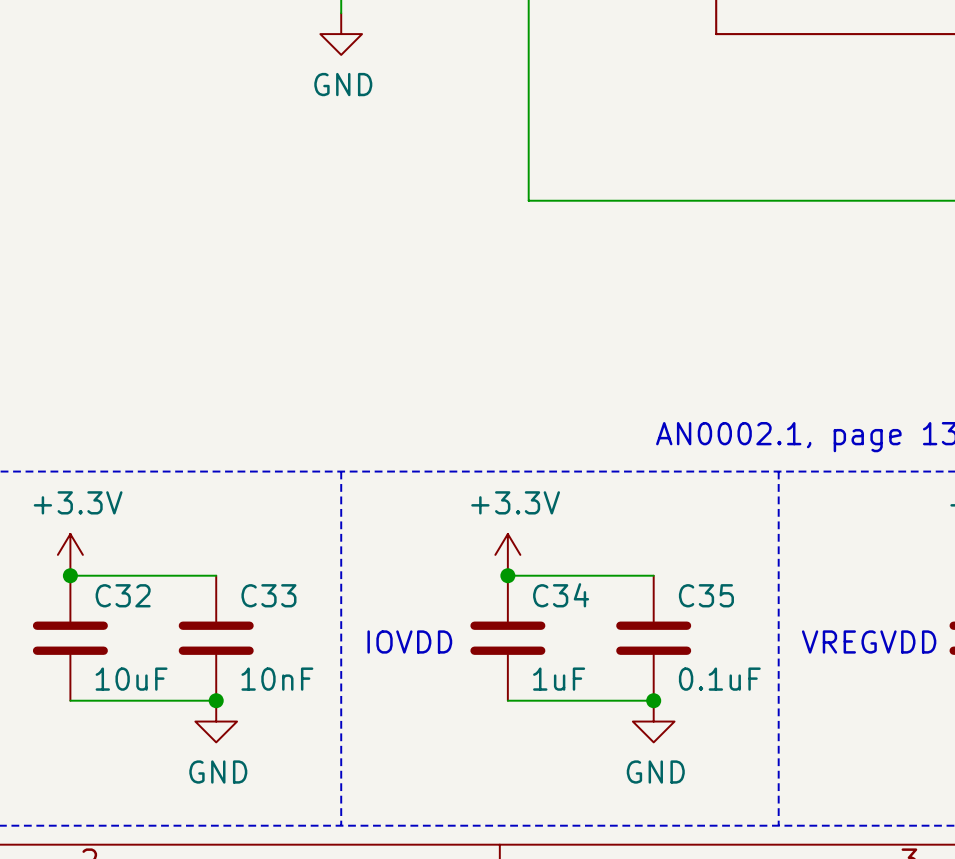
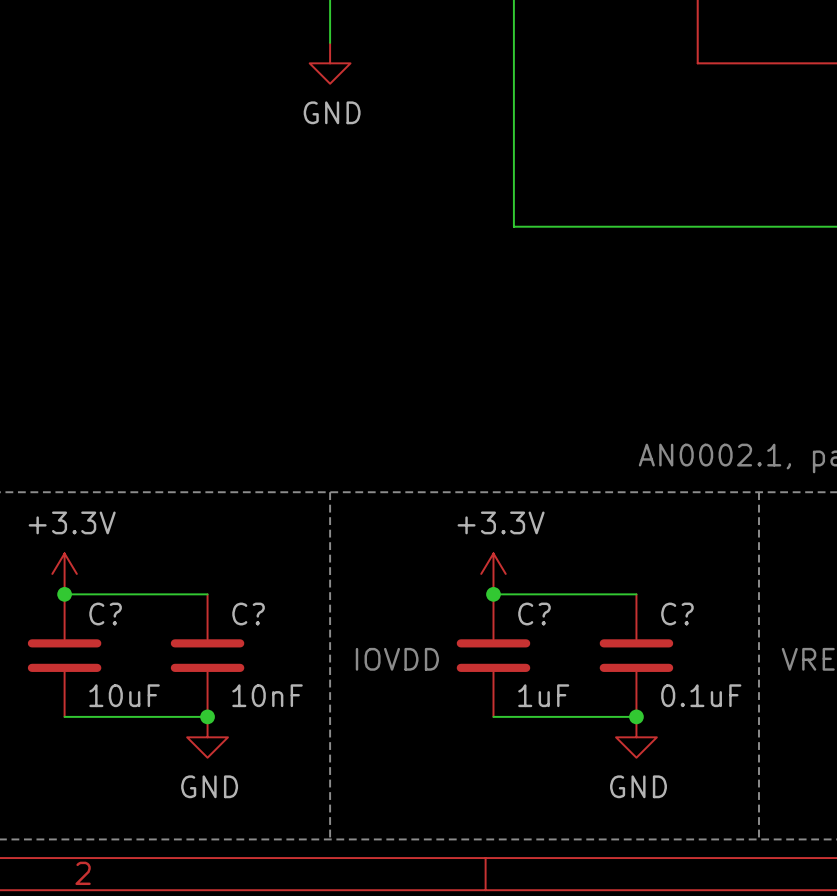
C32 name: C32 (123, 595) -> C? (105, 614)
C33 name: C33 (268, 595) -> C? (248, 614)
C34 name: C34 (561, 595) -> C? (534, 614)
C35 name: C35 (706, 595) -> C? (677, 614)

